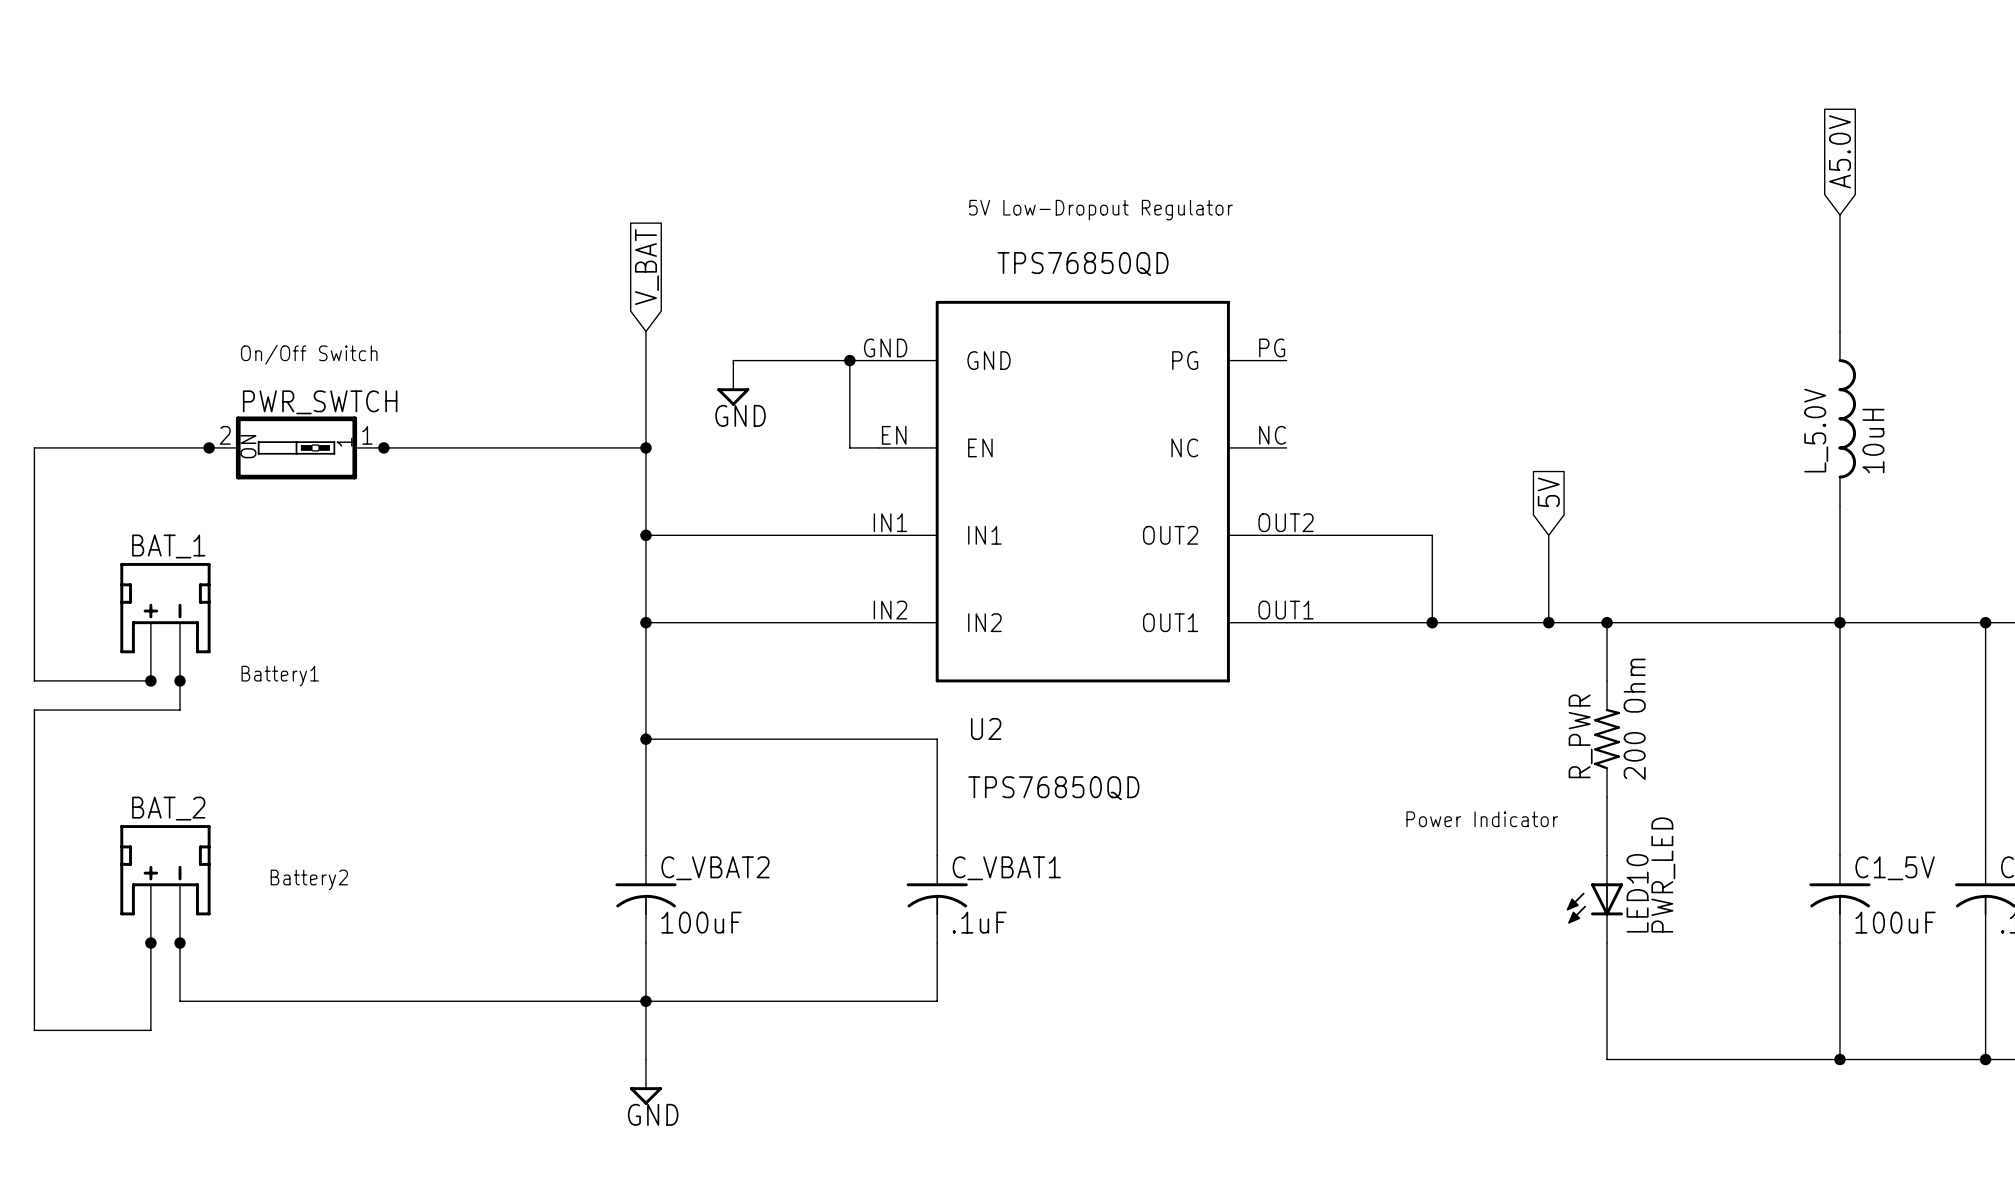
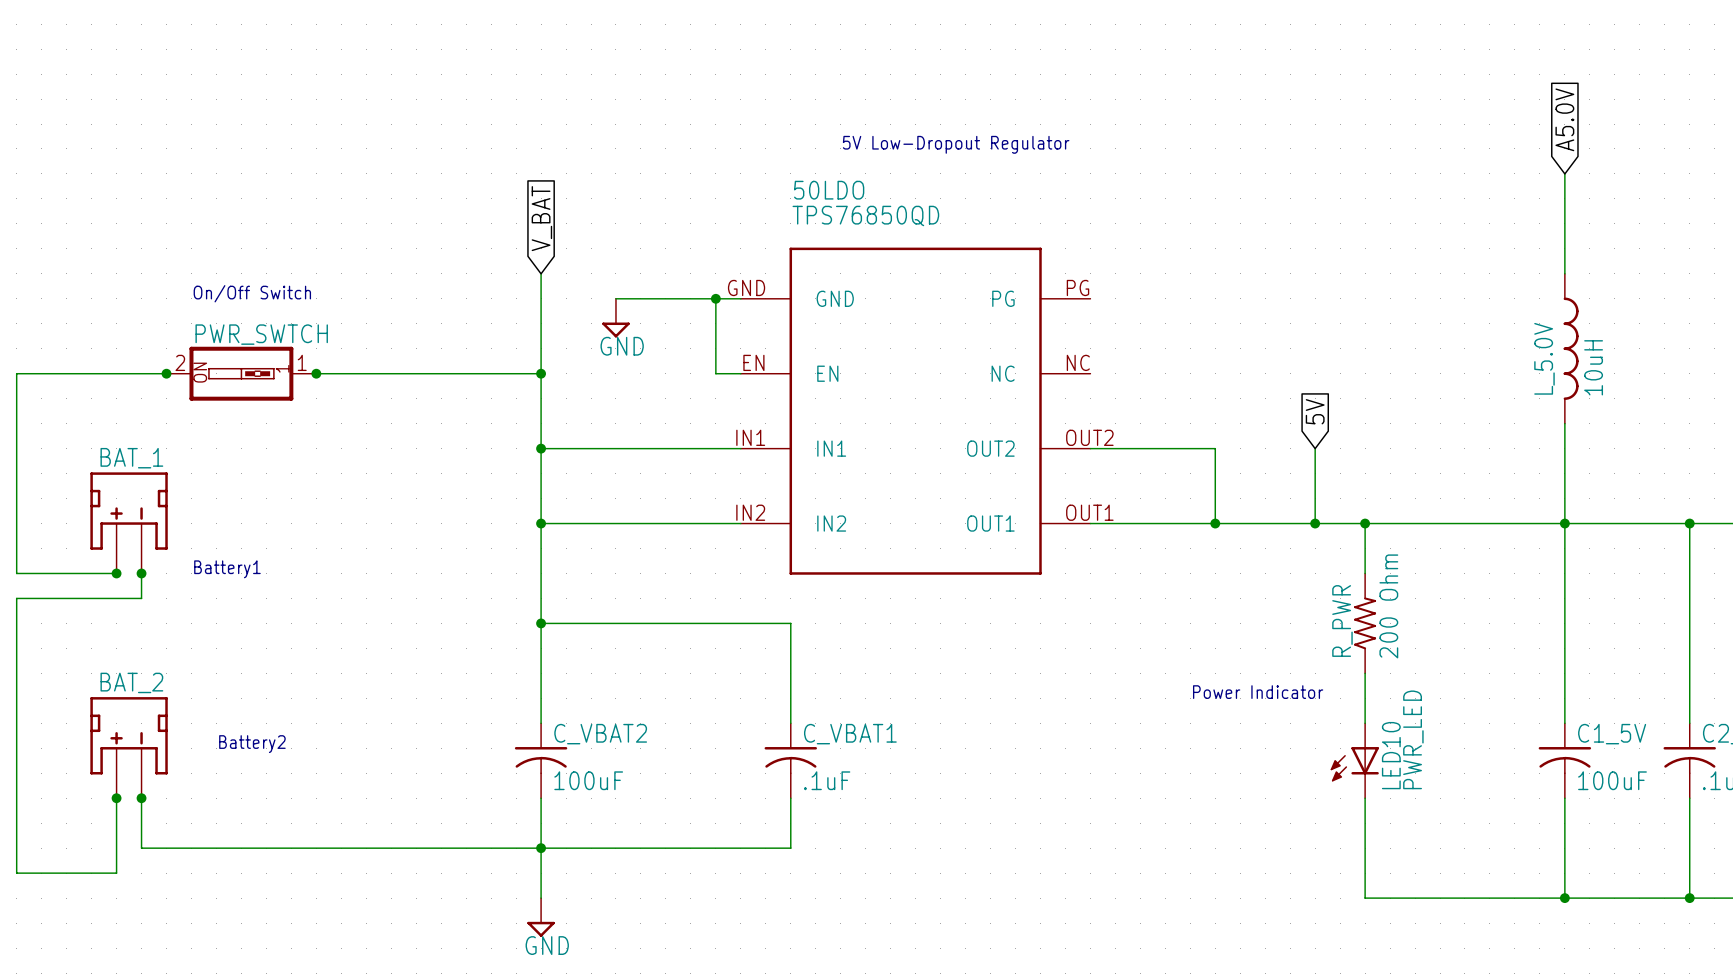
text position: 5V Low-Dropout Regulator (1100, 210) -> 5V Low-Dropout Regulator (956, 144)
U2 text: TPS76850QD (1083, 263) -> none
U2 name: U2 (986, 728) -> 50LDO (829, 190)
U2 value position: TPS76850QD (1053, 788) -> TPS76850QD (865, 215)

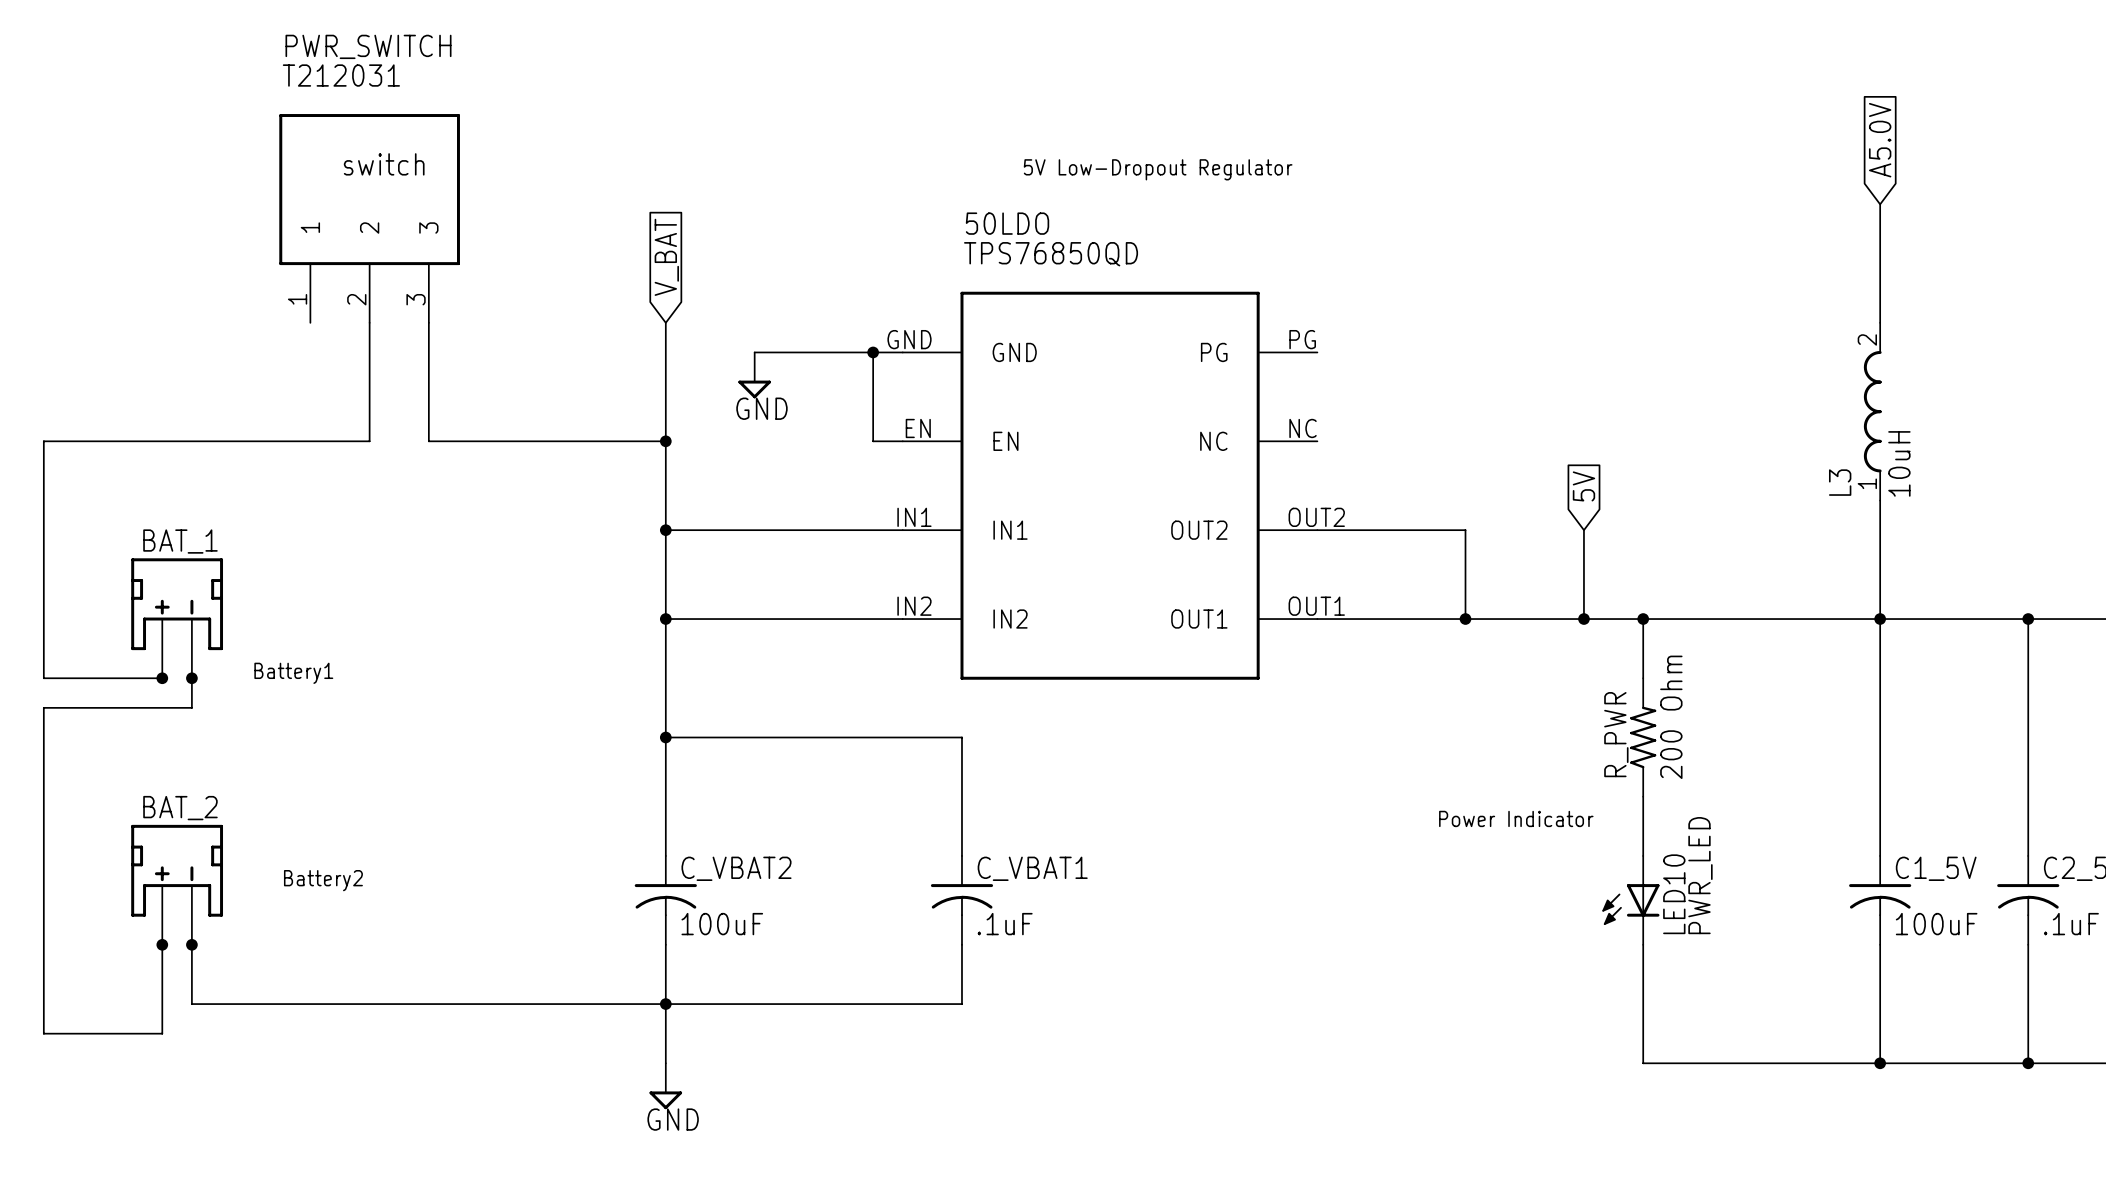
text: none -> switch (384, 164)
PWR_SWITCH: none -> T212031 (369, 218)
wire: none -> (369, 322) (369, 441) (221, 441)
text: On/Off Switch (252, 293) -> none
L3: none -> 10uH (1872, 411)
L_5.0V: 10uH (1571, 348) -> none
junction: (166, 373) -> none
PWR_SWTCH: (241, 373) -> none
wire: (316, 373) (341, 373) -> (428, 322) (428, 441)
junction: (316, 373) -> none

